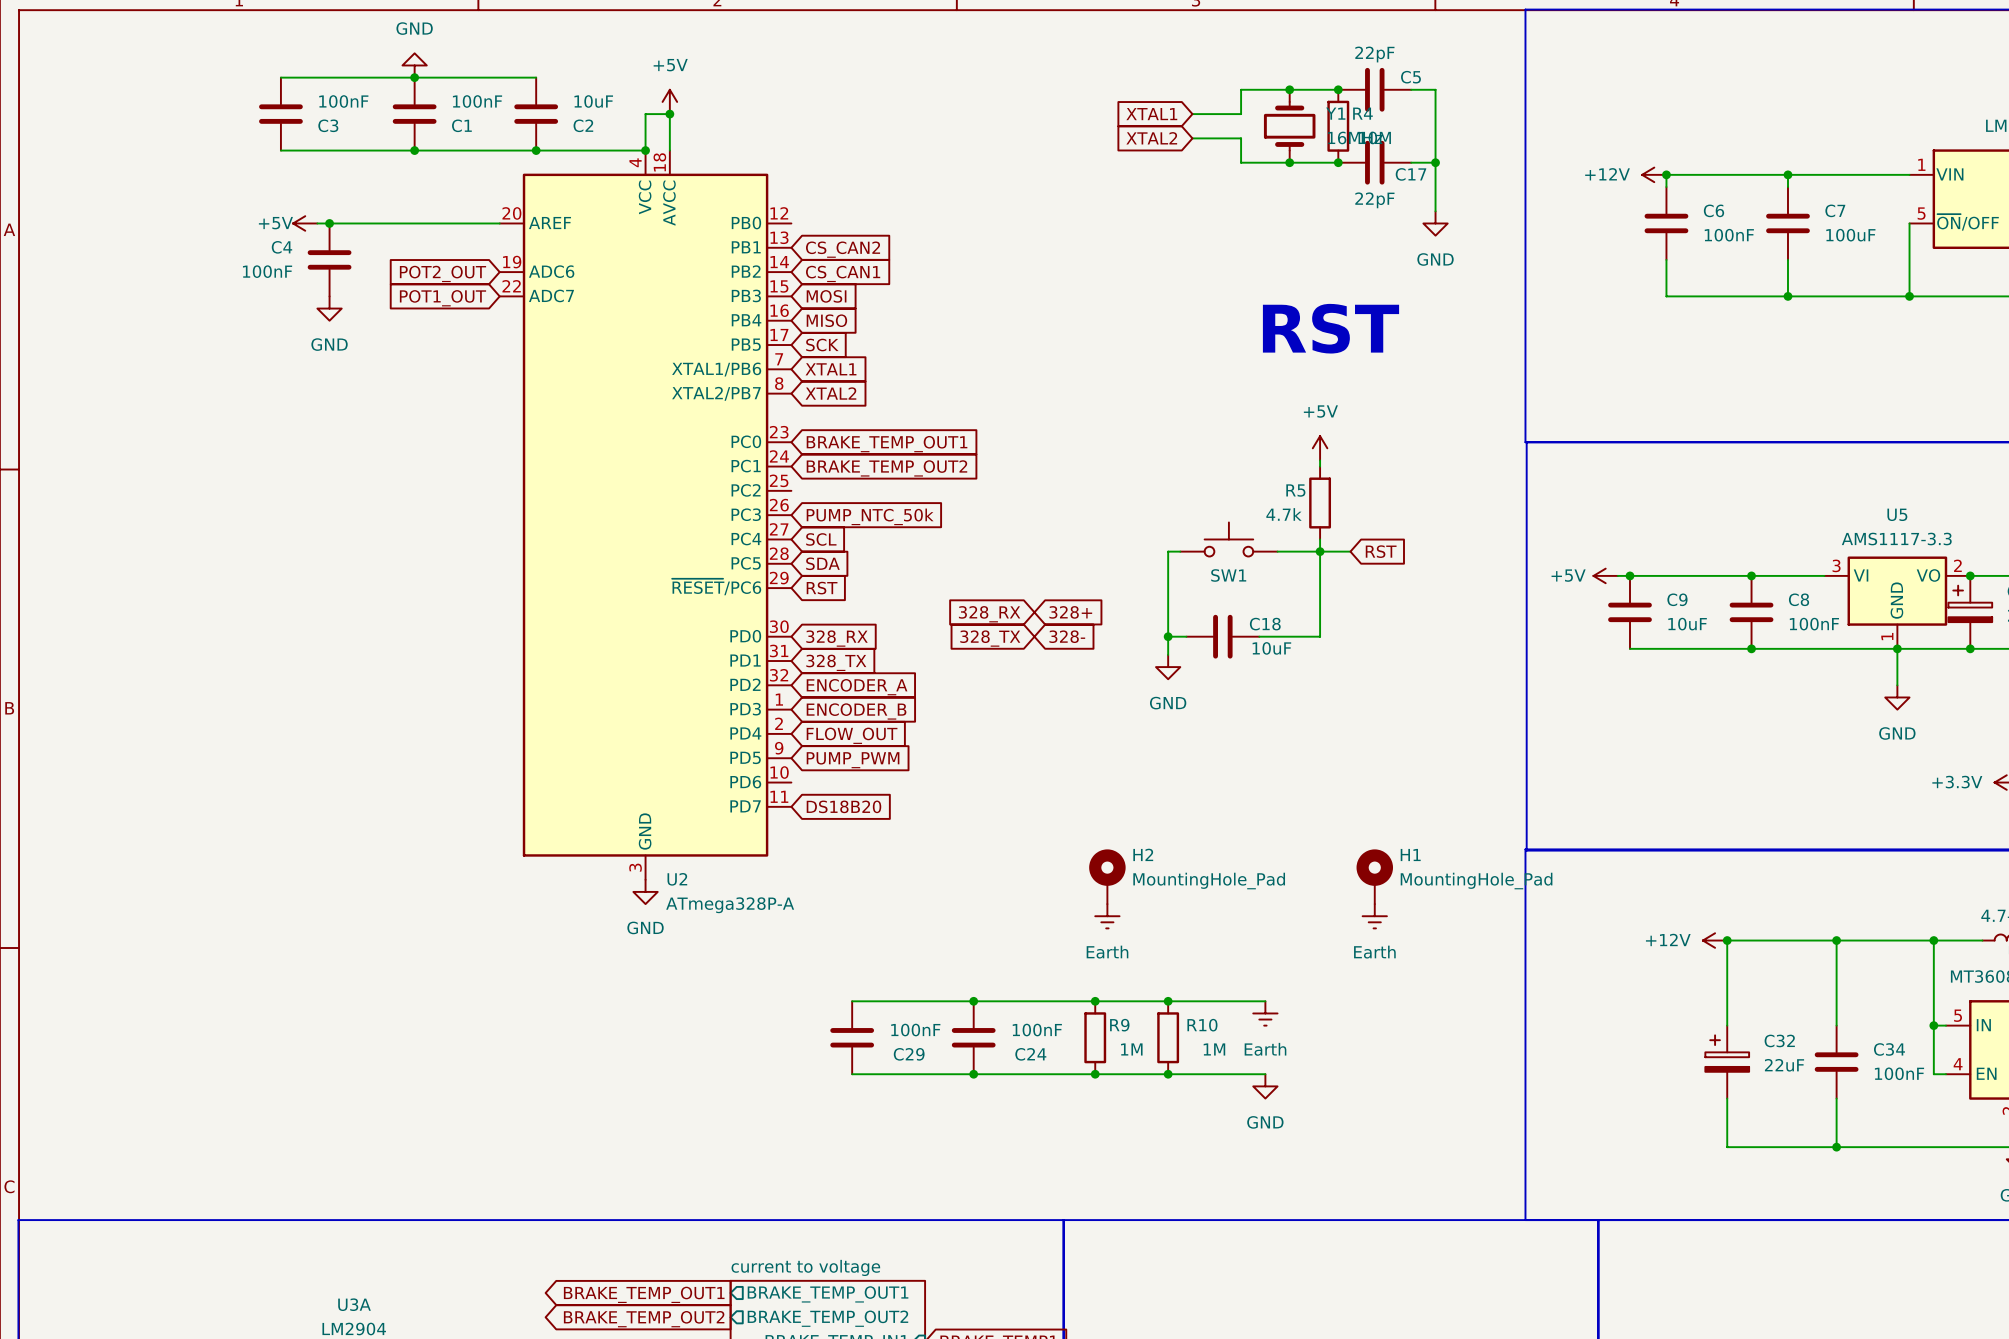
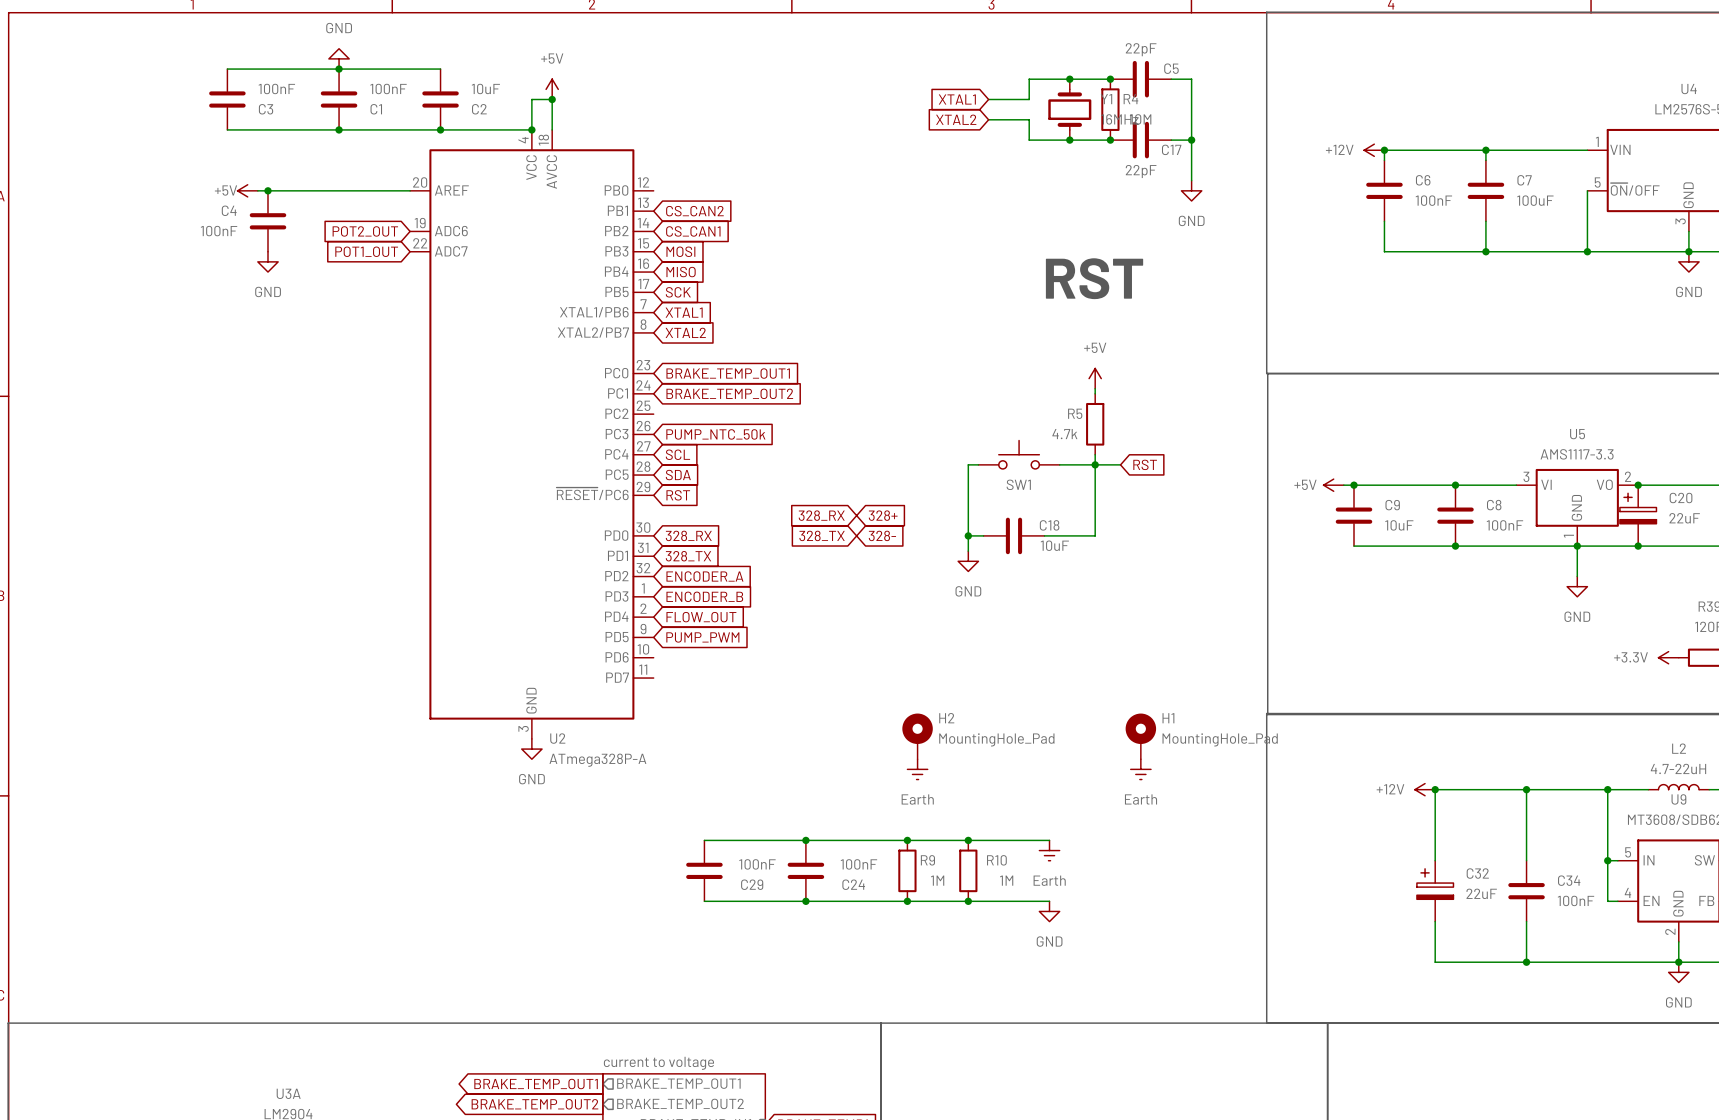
global label: DS18B20 (843, 806) -> none

